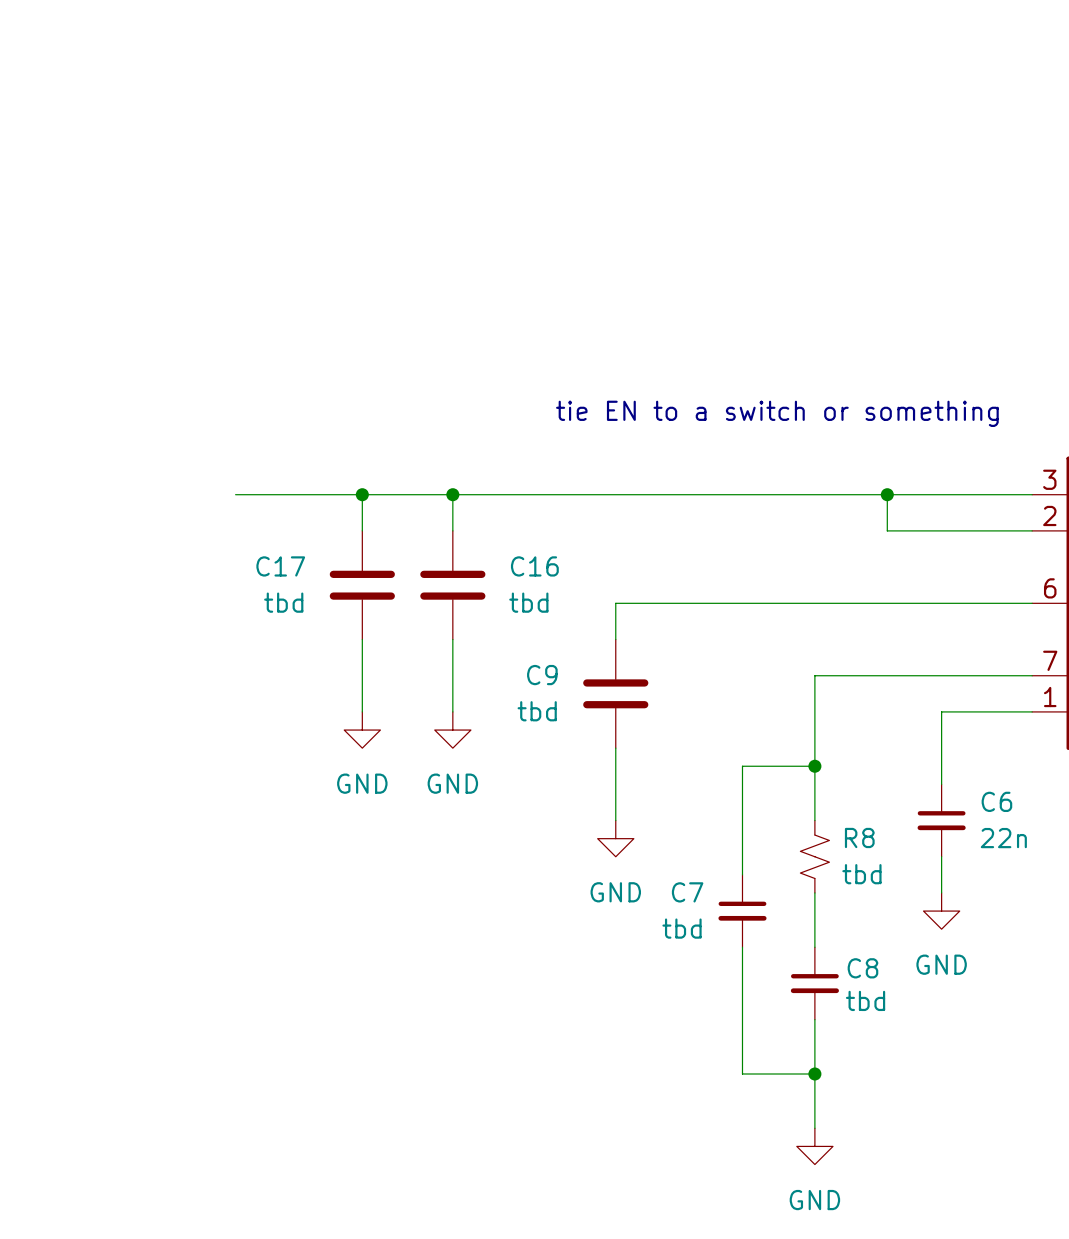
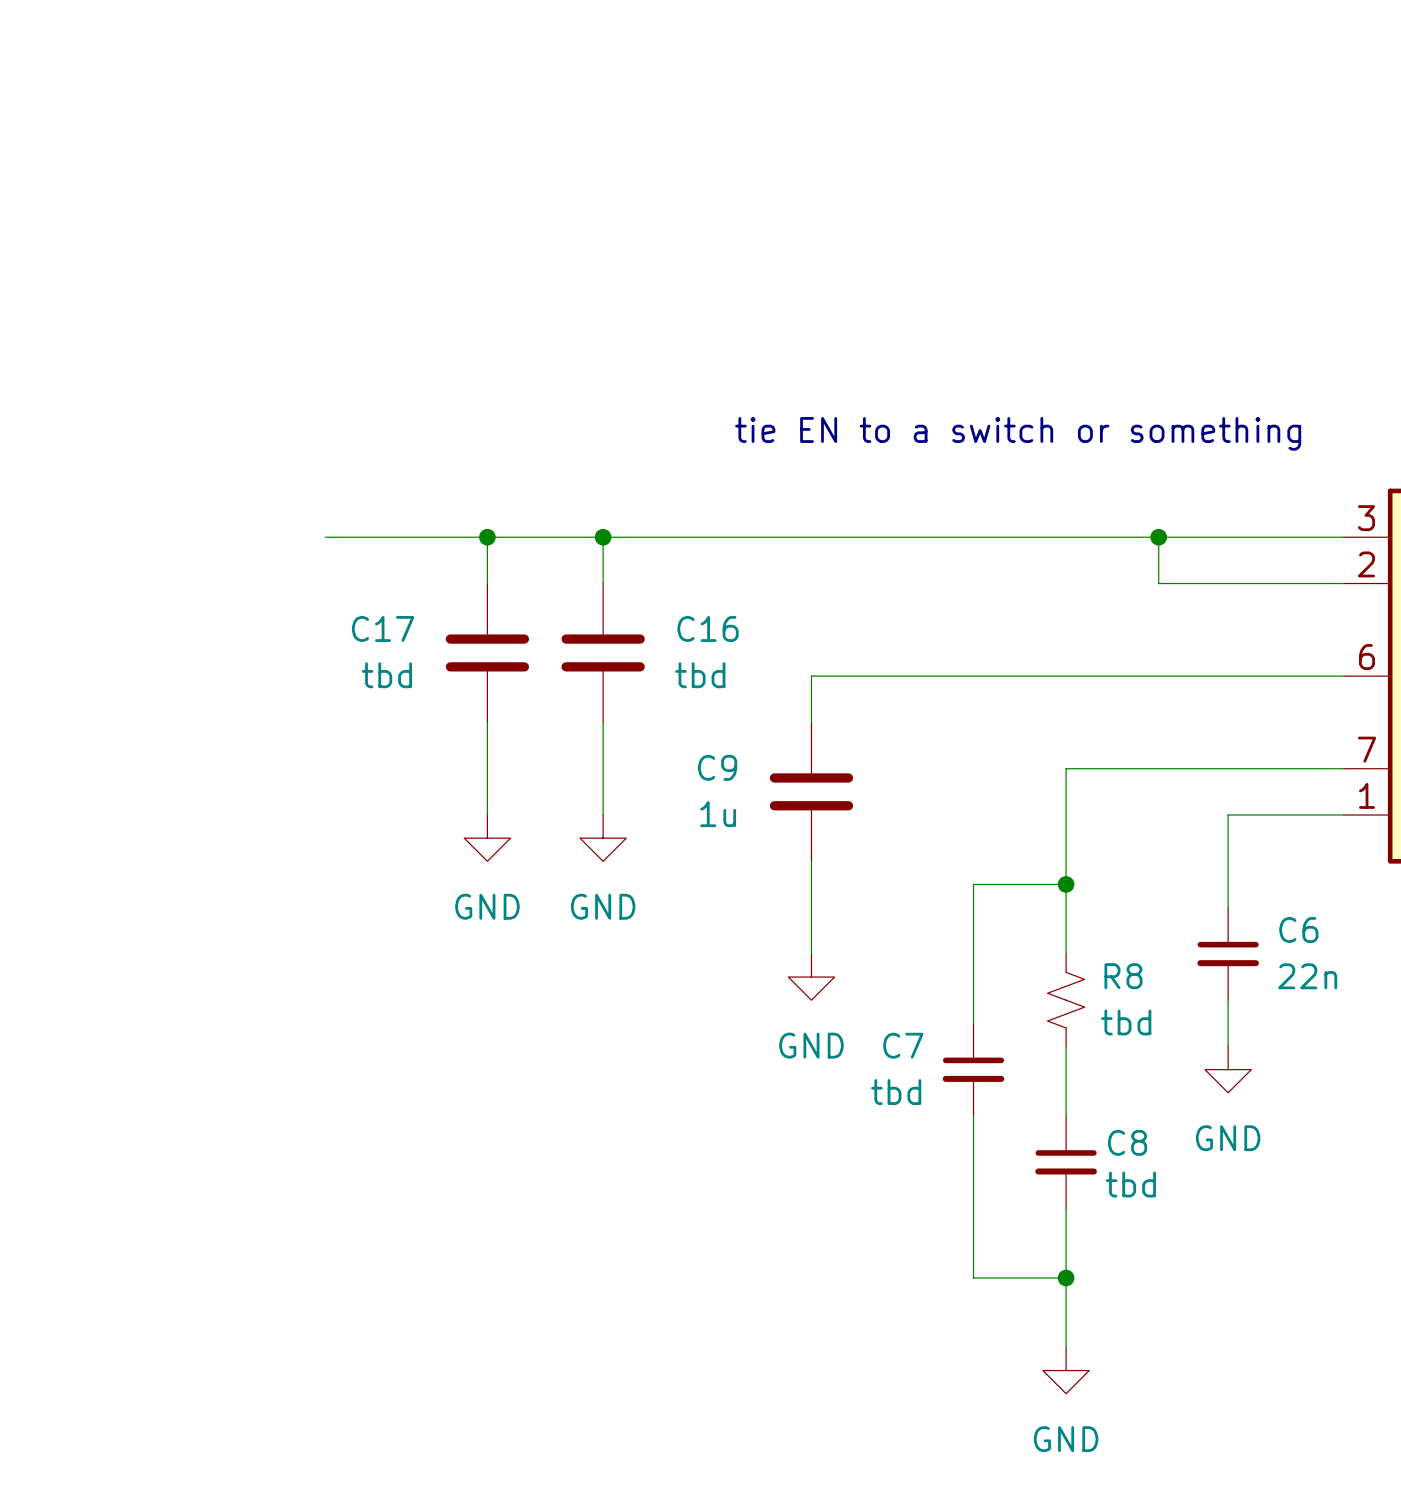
C9 value: tbd (537, 711) -> 1u (718, 814)

